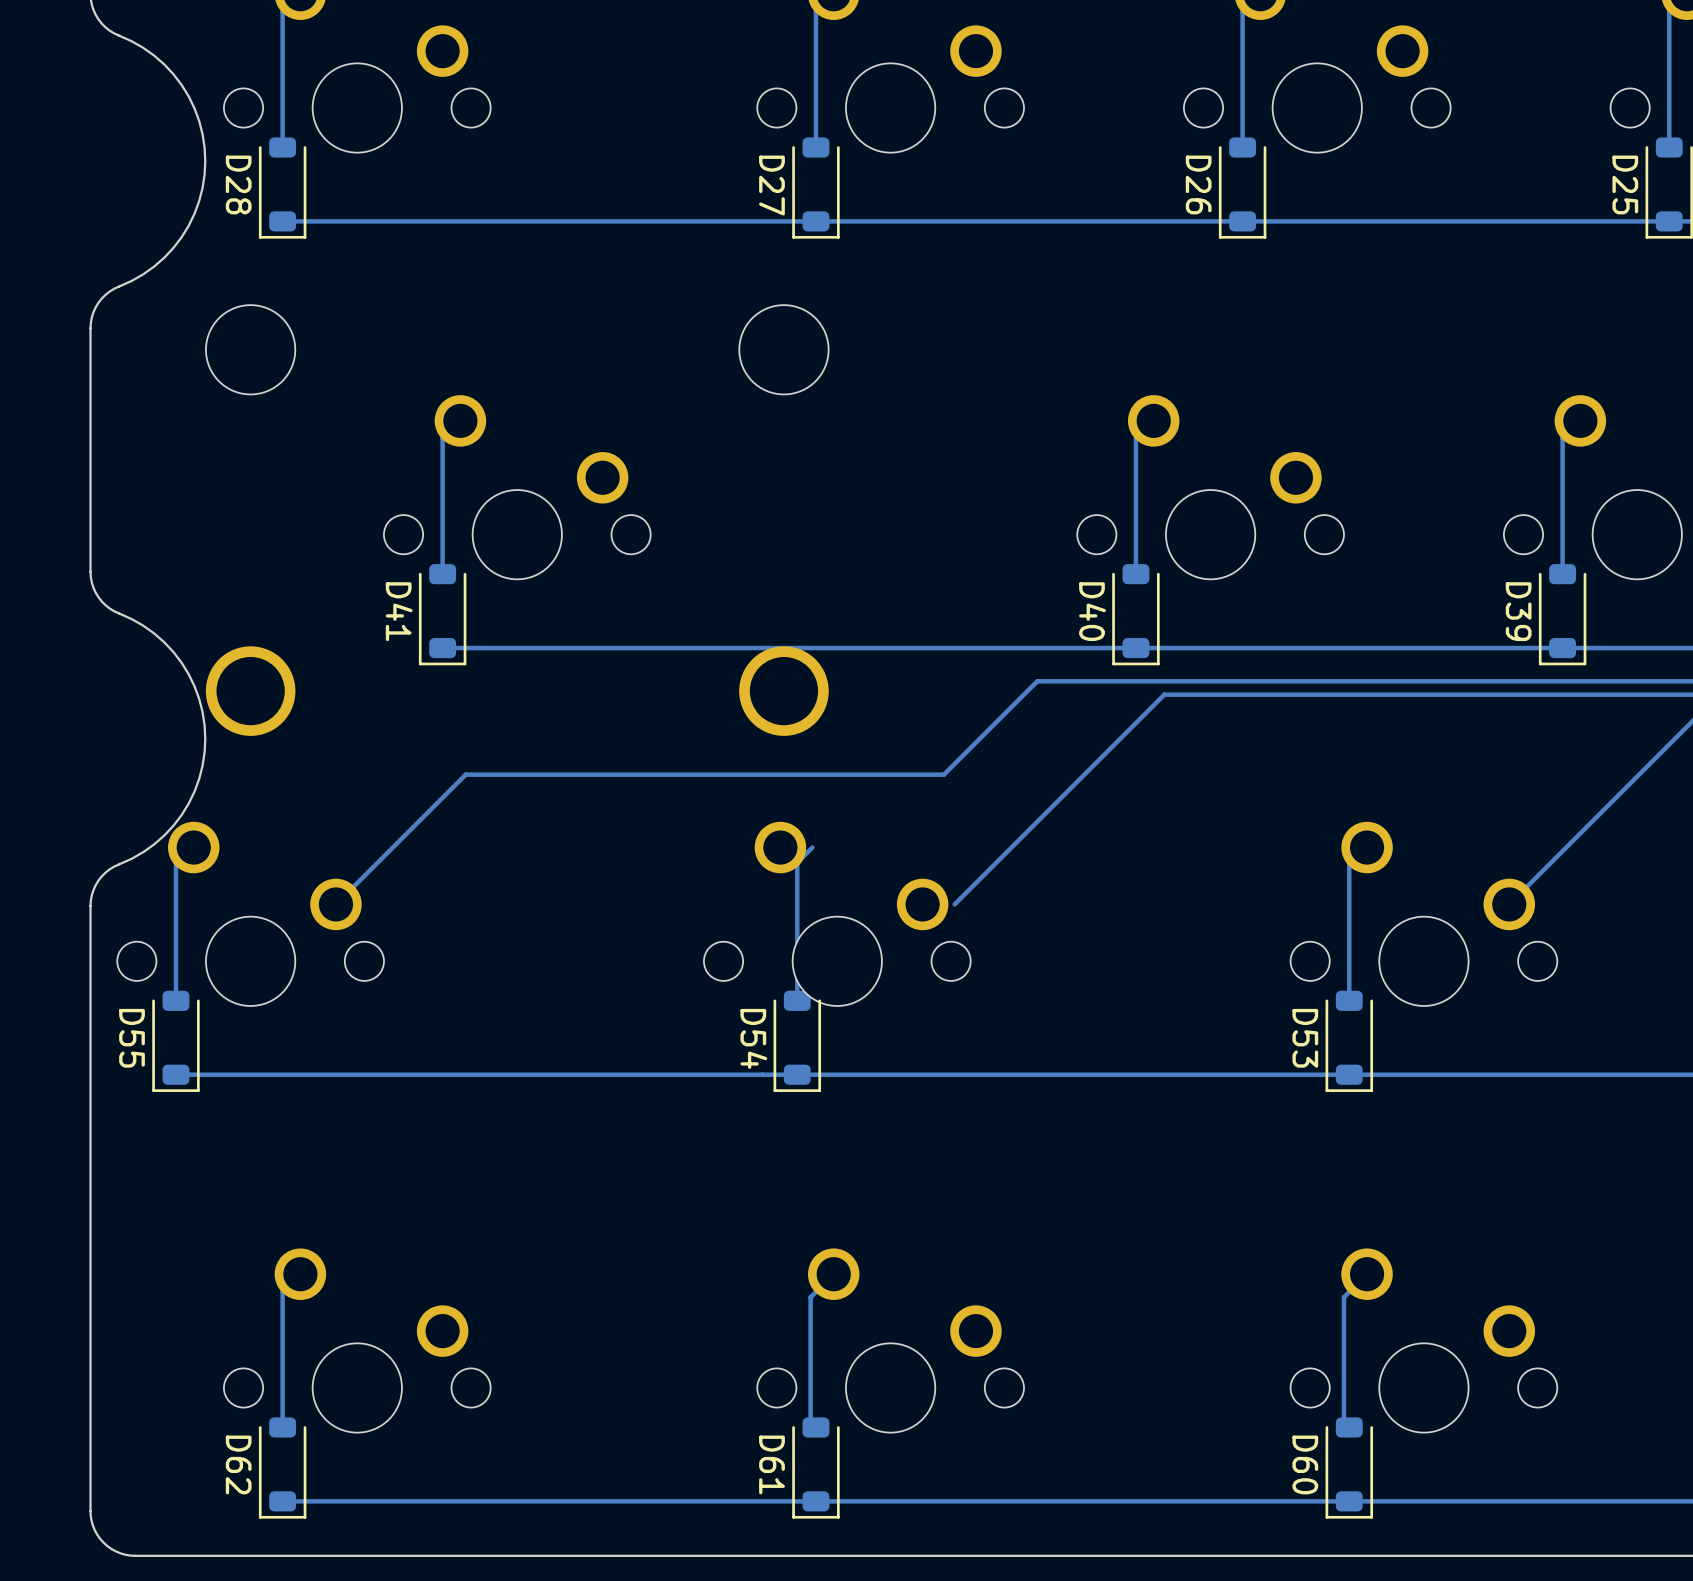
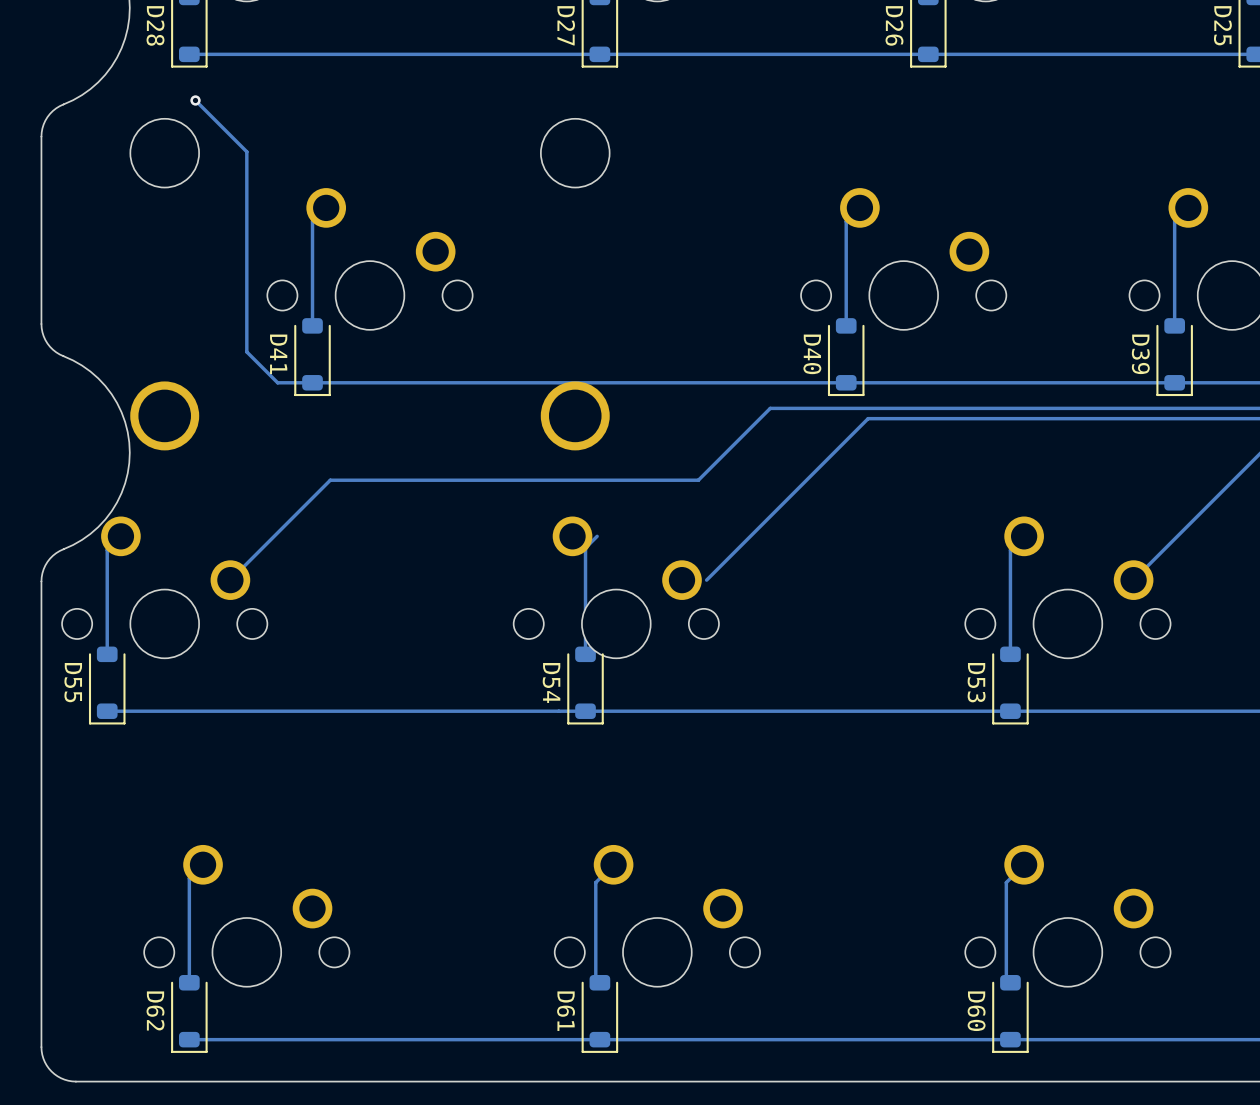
track: none -> (195, 100) (246, 151) (246, 351) (277, 382) (312, 382)
via: none -> (195, 100)

